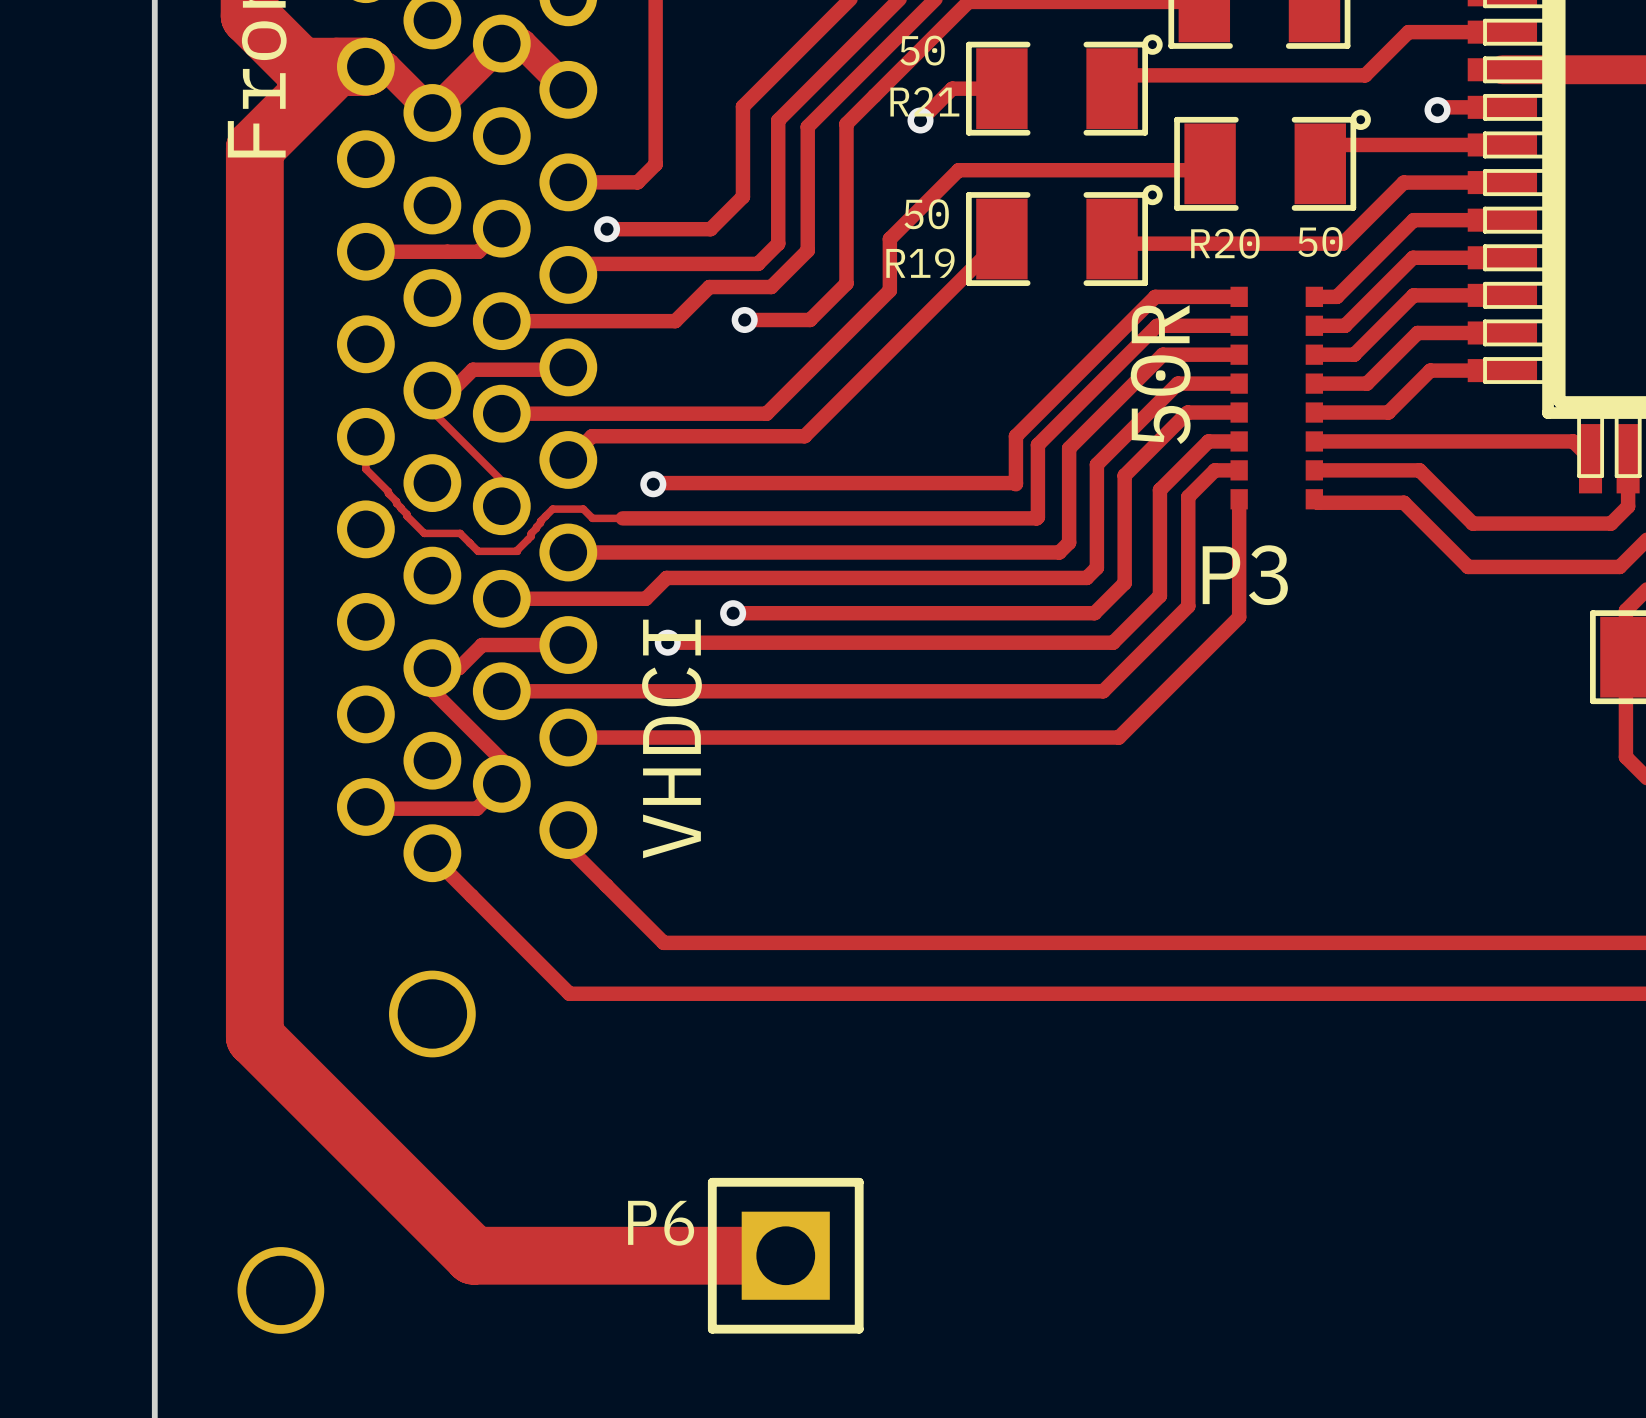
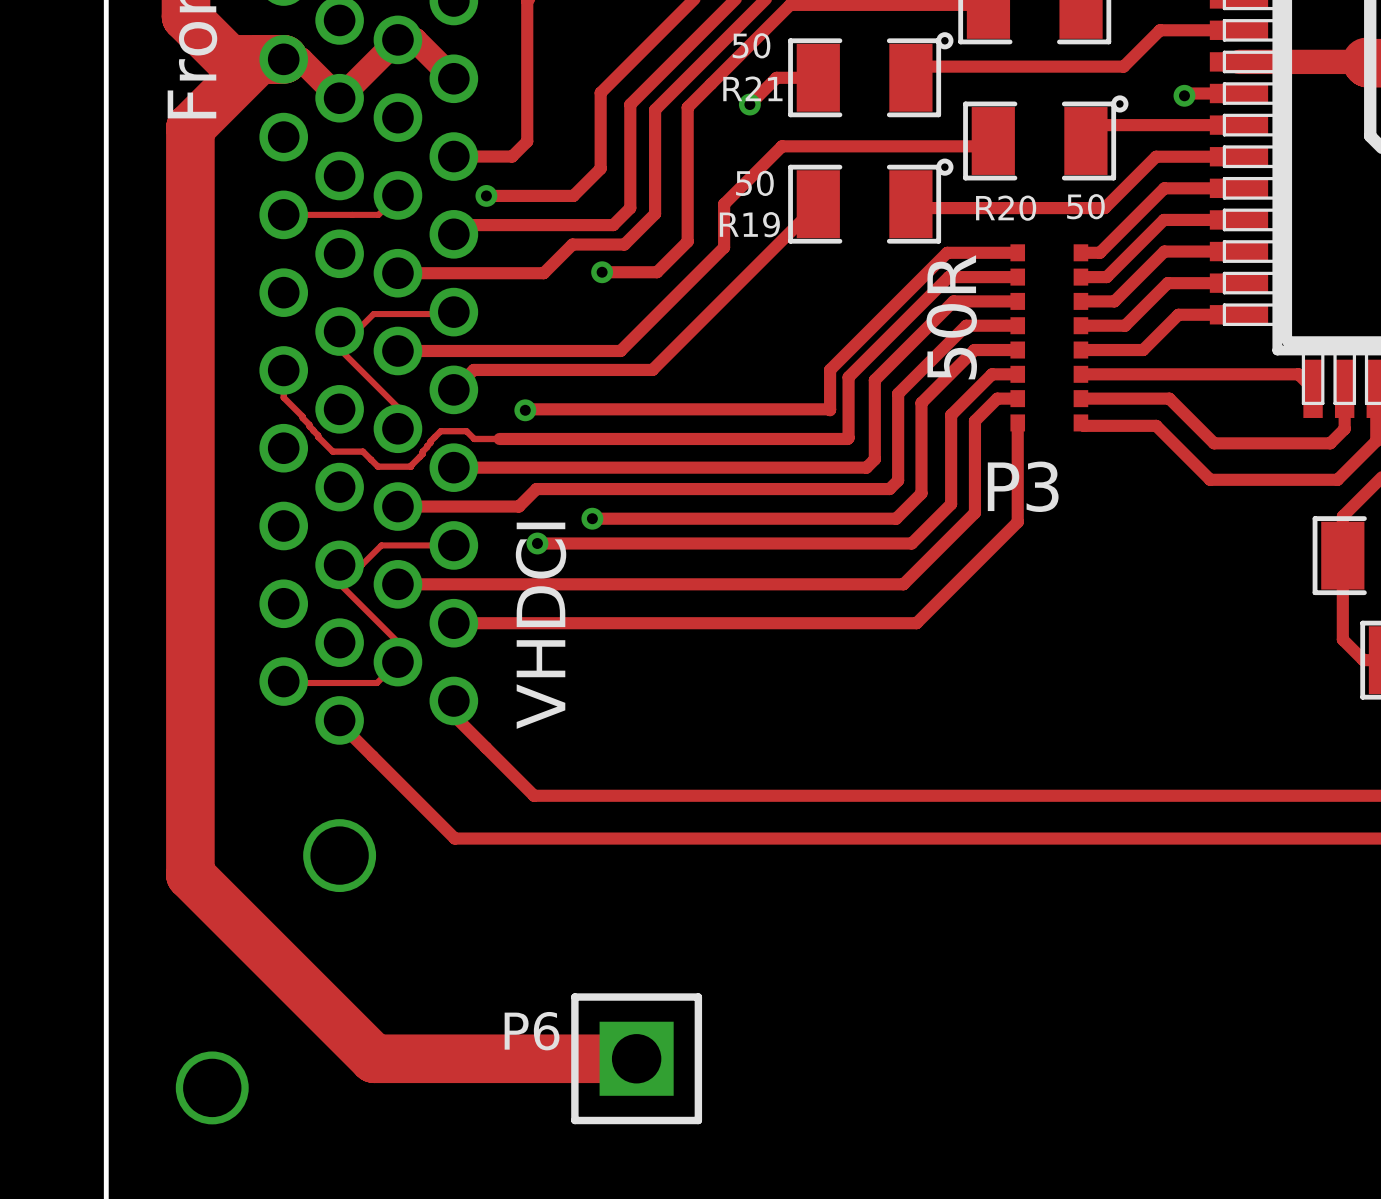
track width: thick (501, 228) (478, 251) (365, 251) -> thin (397, 195) (378, 214) (283, 214)
track width: thick (568, 367) (565, 369) (472, 369) (452, 390) (432, 390) (432, 411) (501, 480) (501, 506) -> thin (453, 312) (451, 314) (373, 314) (356, 331) (339, 331) (339, 349) (397, 407) (397, 428)
track width: thick (568, 645) (482, 645) (459, 668) (432, 668) (432, 690) (501, 760) (501, 783) (476, 808) (367, 808) (365, 806) -> thin (453, 545) (381, 545) (361, 564) (339, 564) (339, 583) (397, 642) (397, 662) (377, 683) (283, 681)

